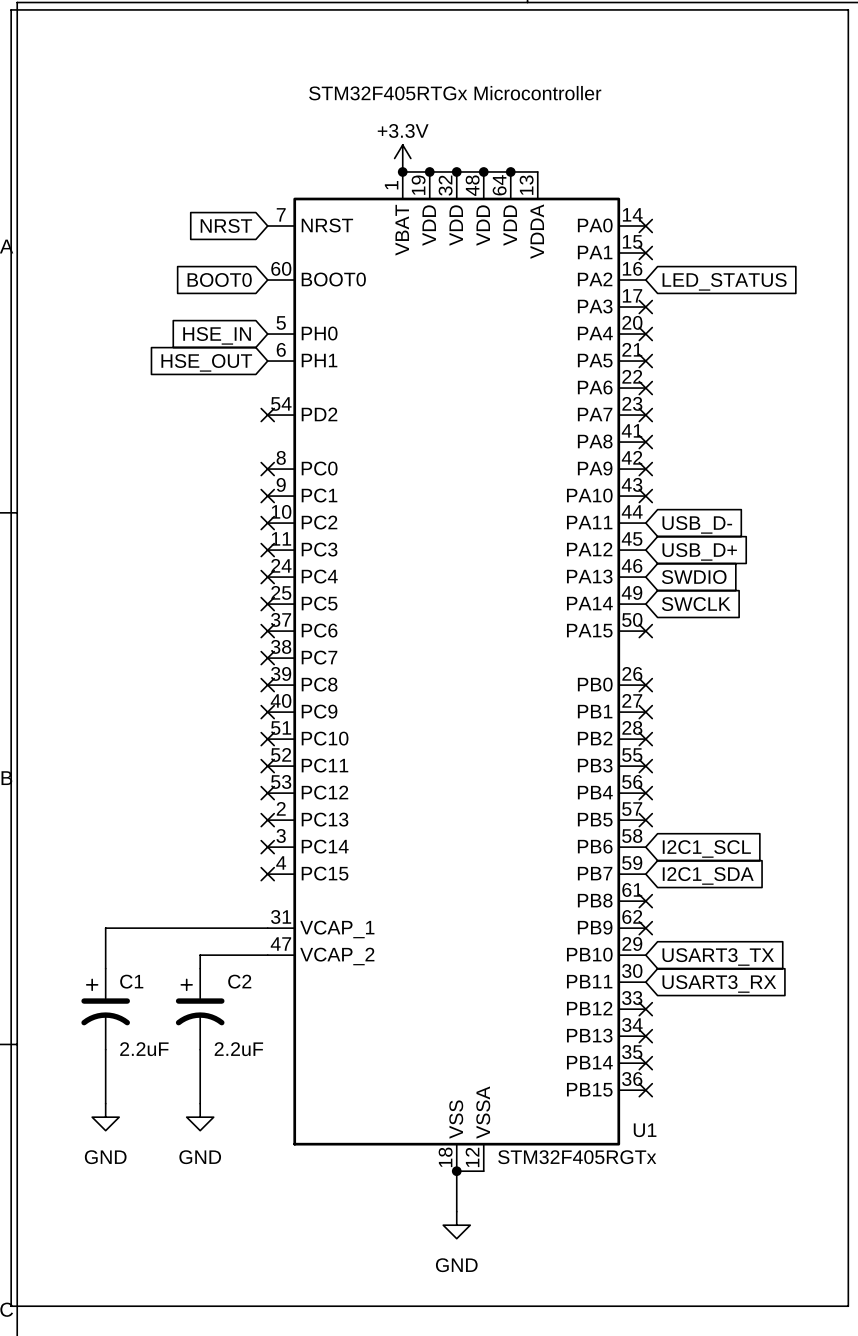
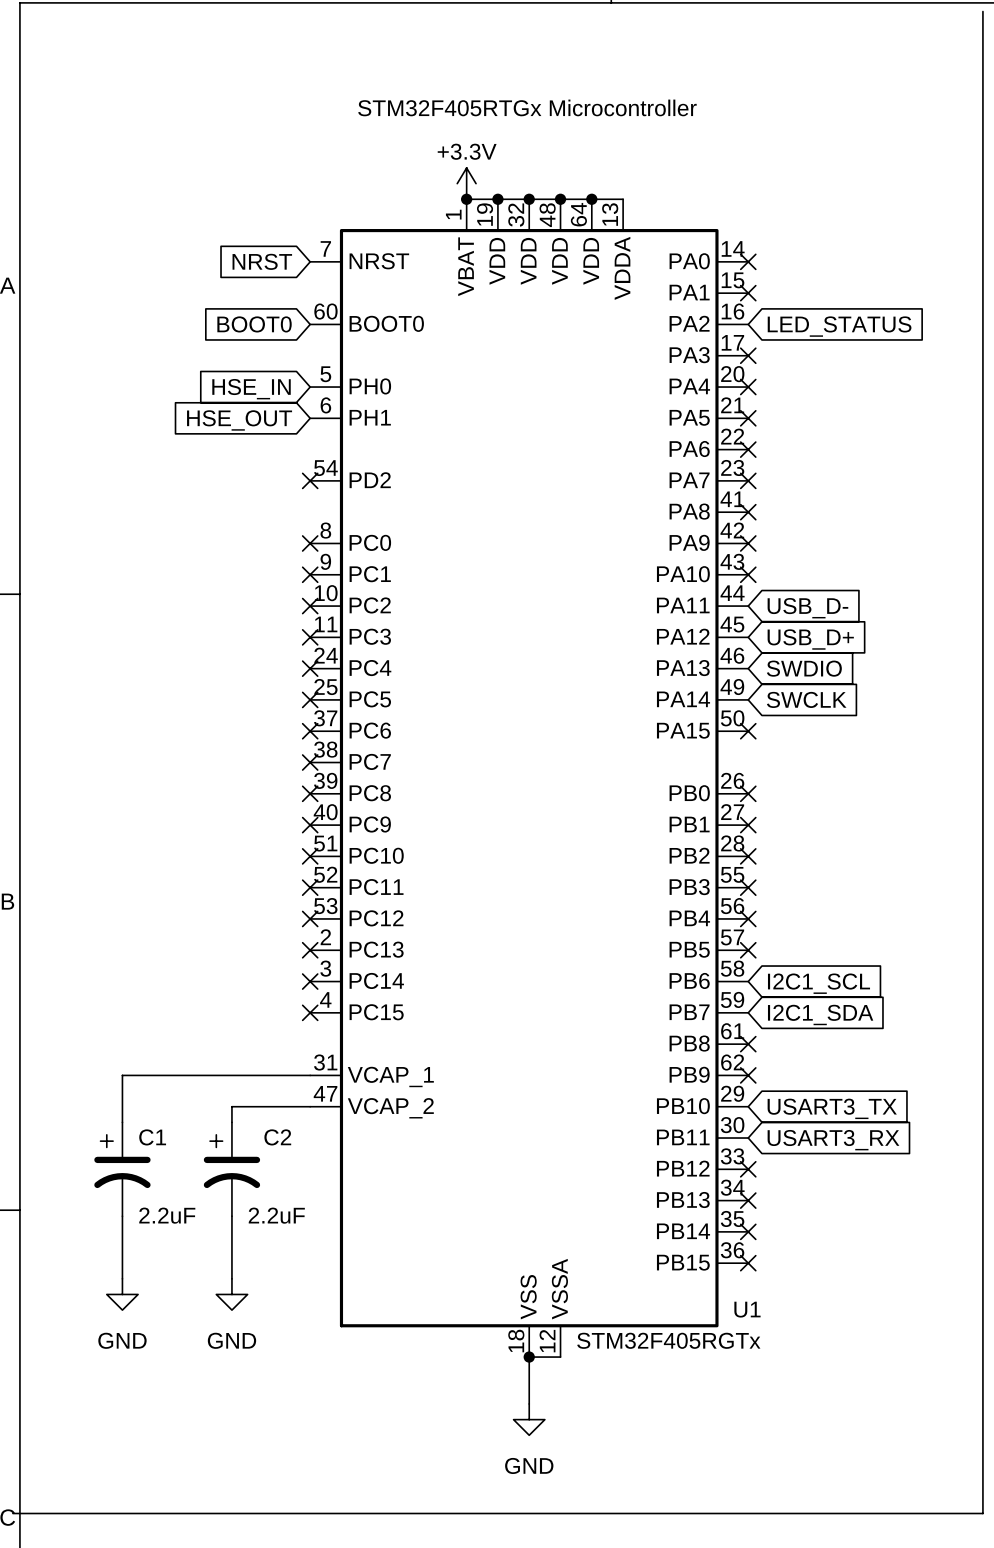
bus: (848, 9) (11, 9) (11, 1306) -> none

